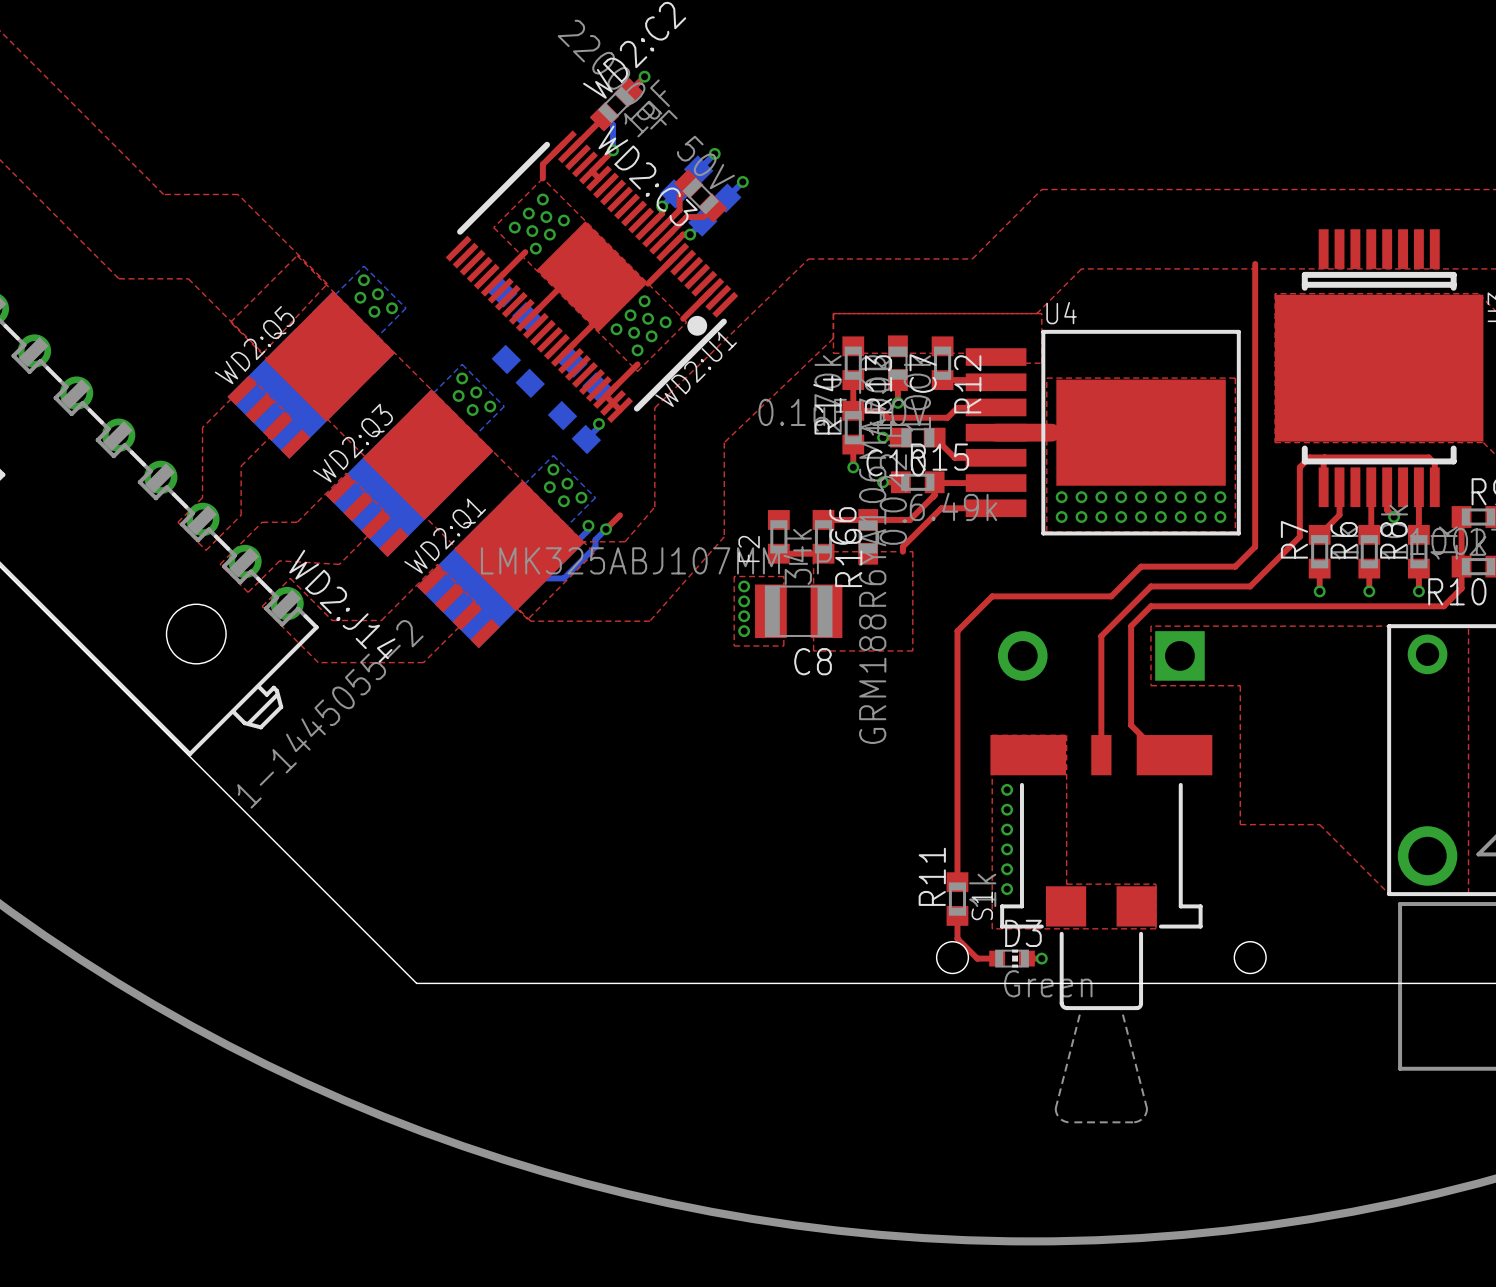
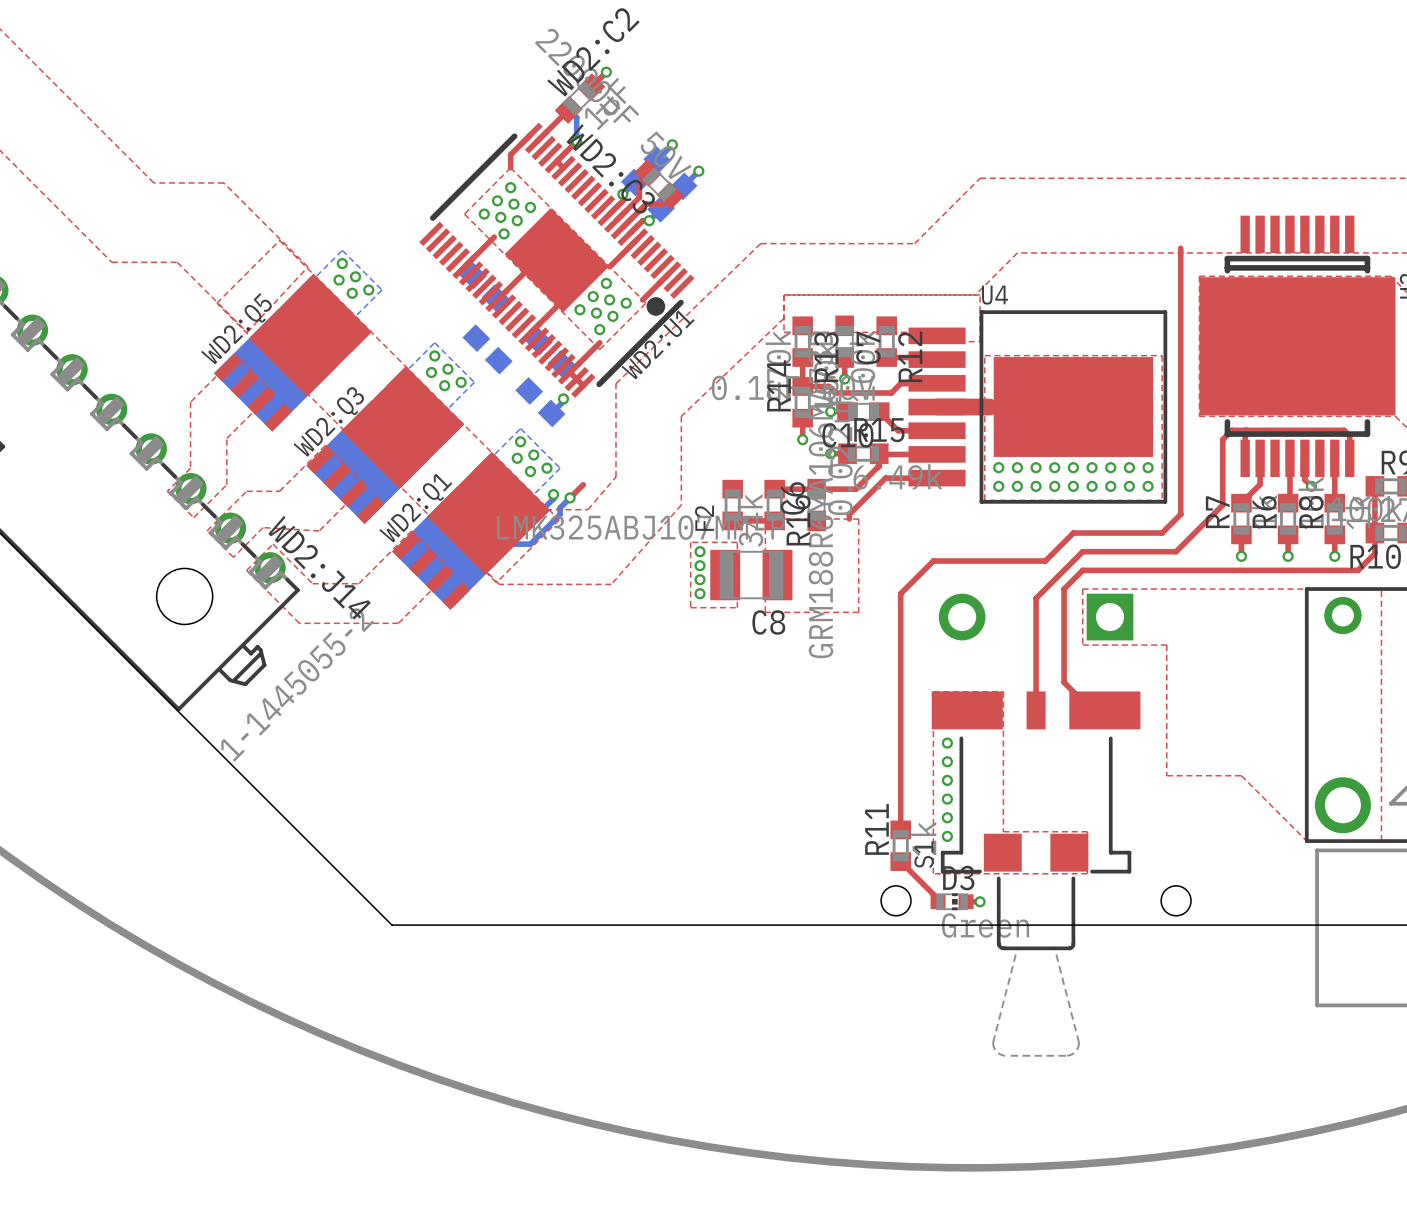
top track: (957, 915) (957, 938) (977, 958) (997, 958) -> (900, 861) (938, 898) (938, 901)

